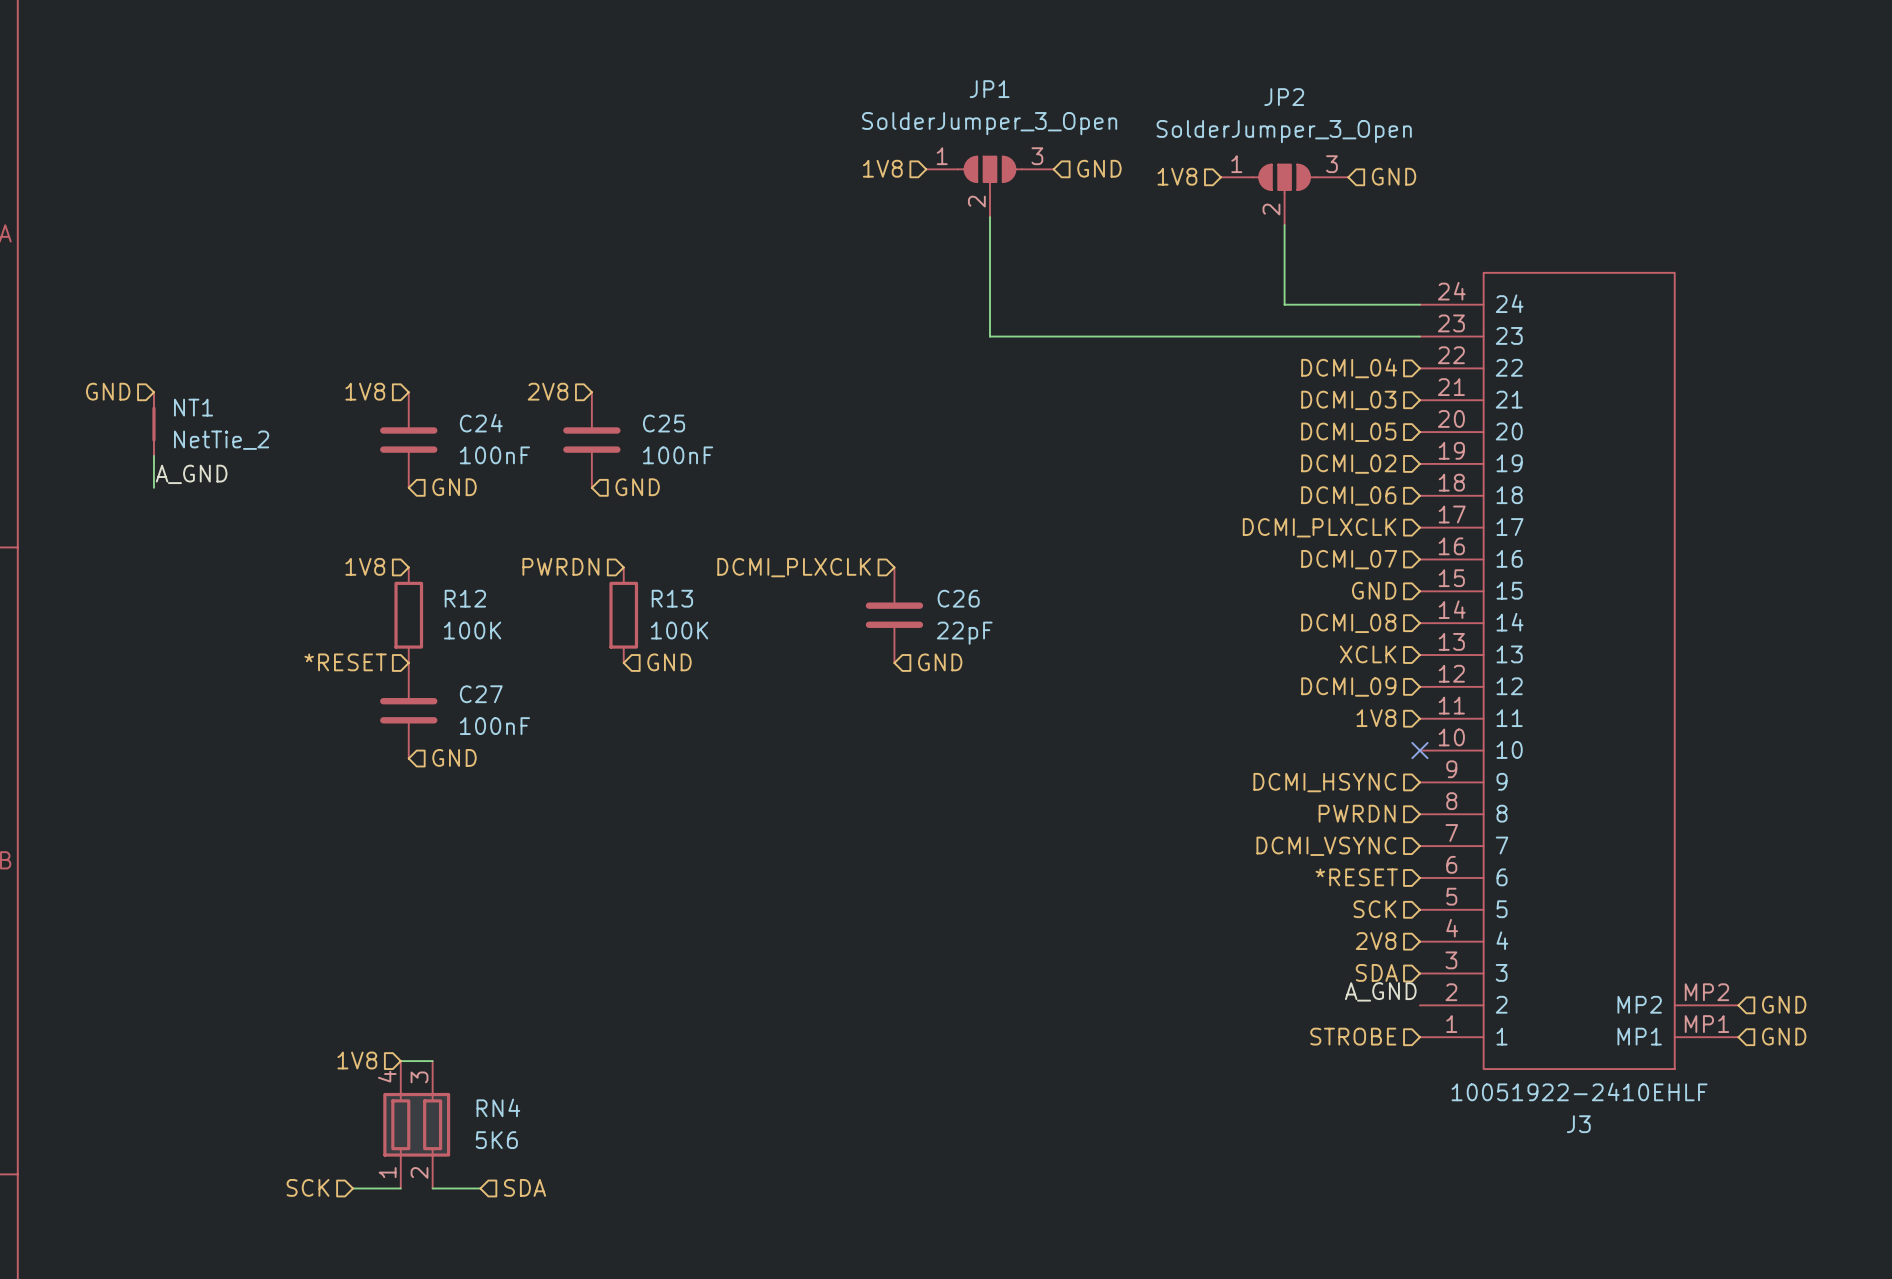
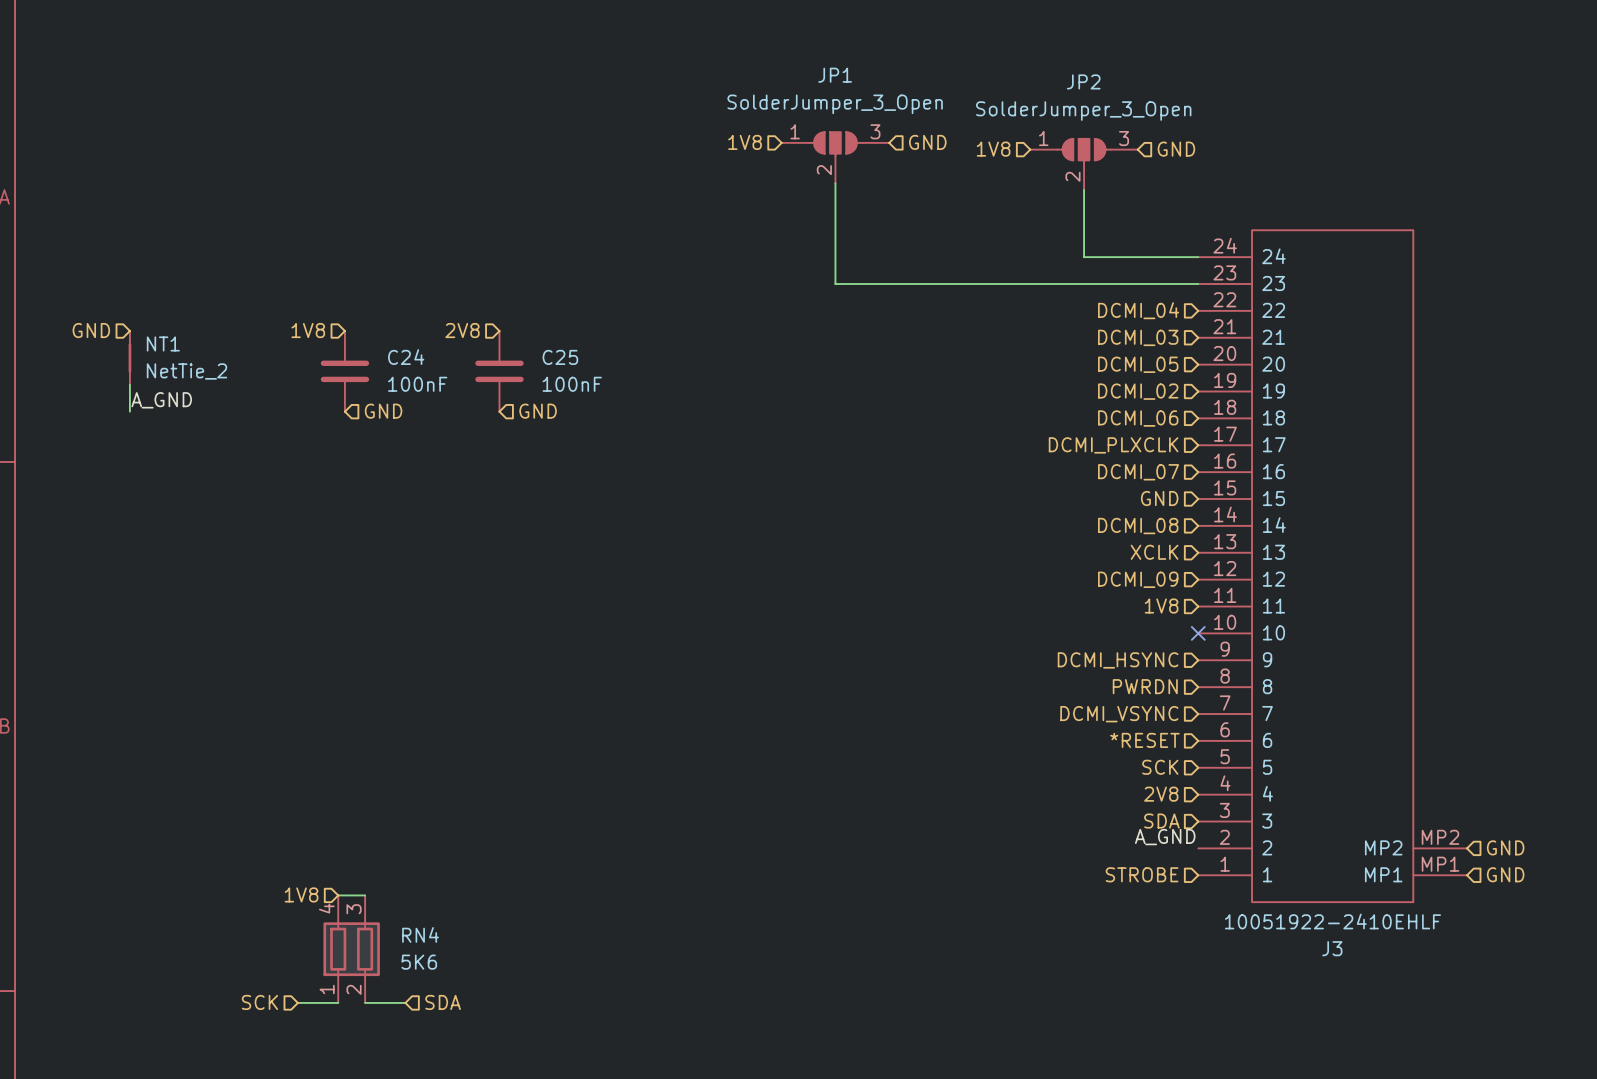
hierarchical label: 1V8 (365, 566) -> none
hierarchical label: PWRDN (560, 566) -> none
hierarchical label: DCMI_PLXCLK (794, 567) -> none
R12: 100K (408, 615) -> none
R13: 100K (623, 615) -> none
C26: 22pF (894, 615) -> none
hierarchical label: *RESET (345, 662) -> none
hierarchical label: GND (669, 662) -> none
hierarchical label: GND (940, 662) -> none
C27: 100nF (408, 710) -> none
hierarchical label: GND (454, 757) -> none

